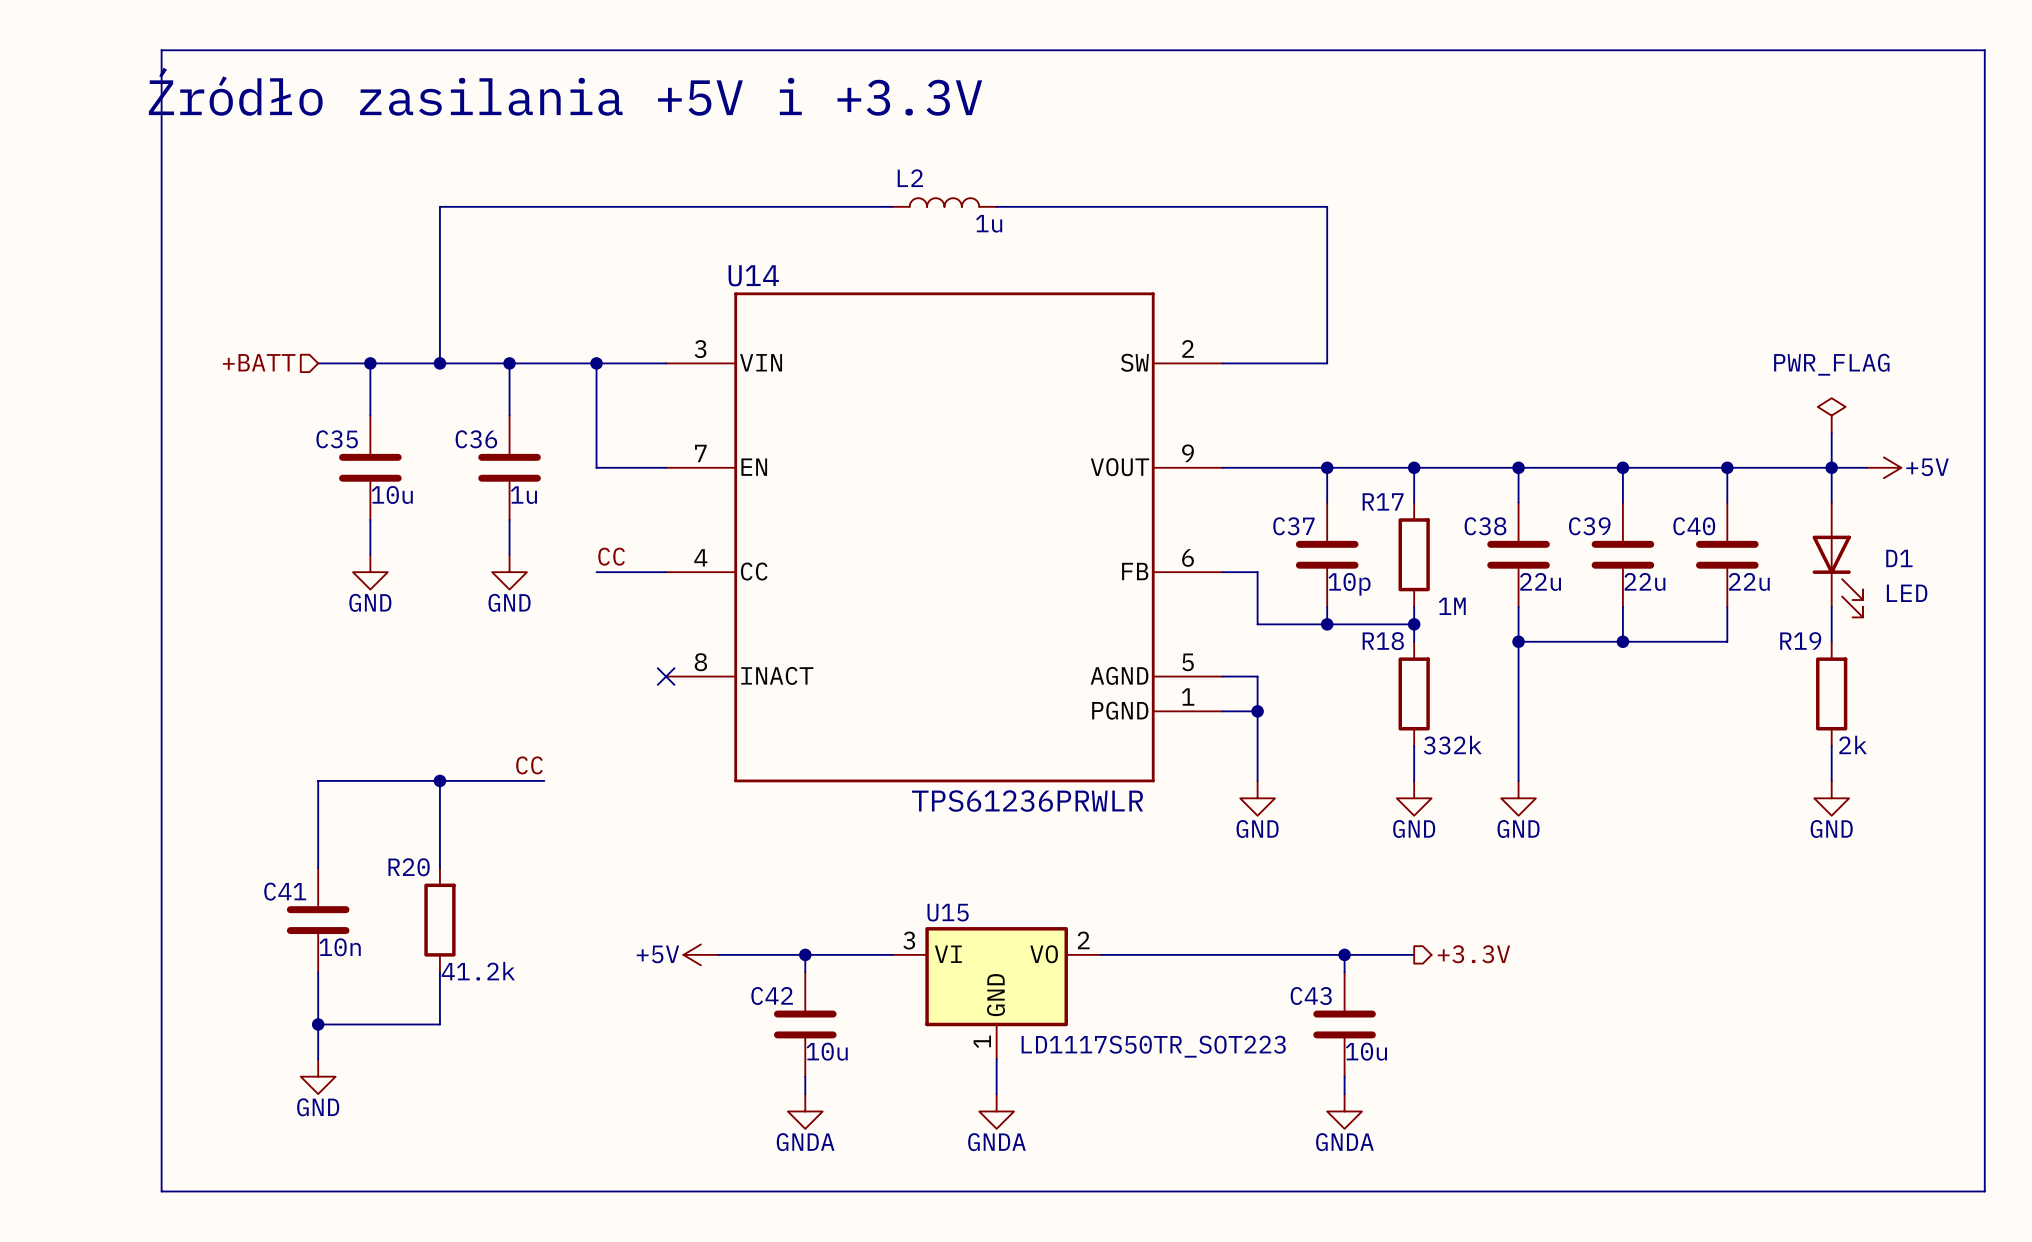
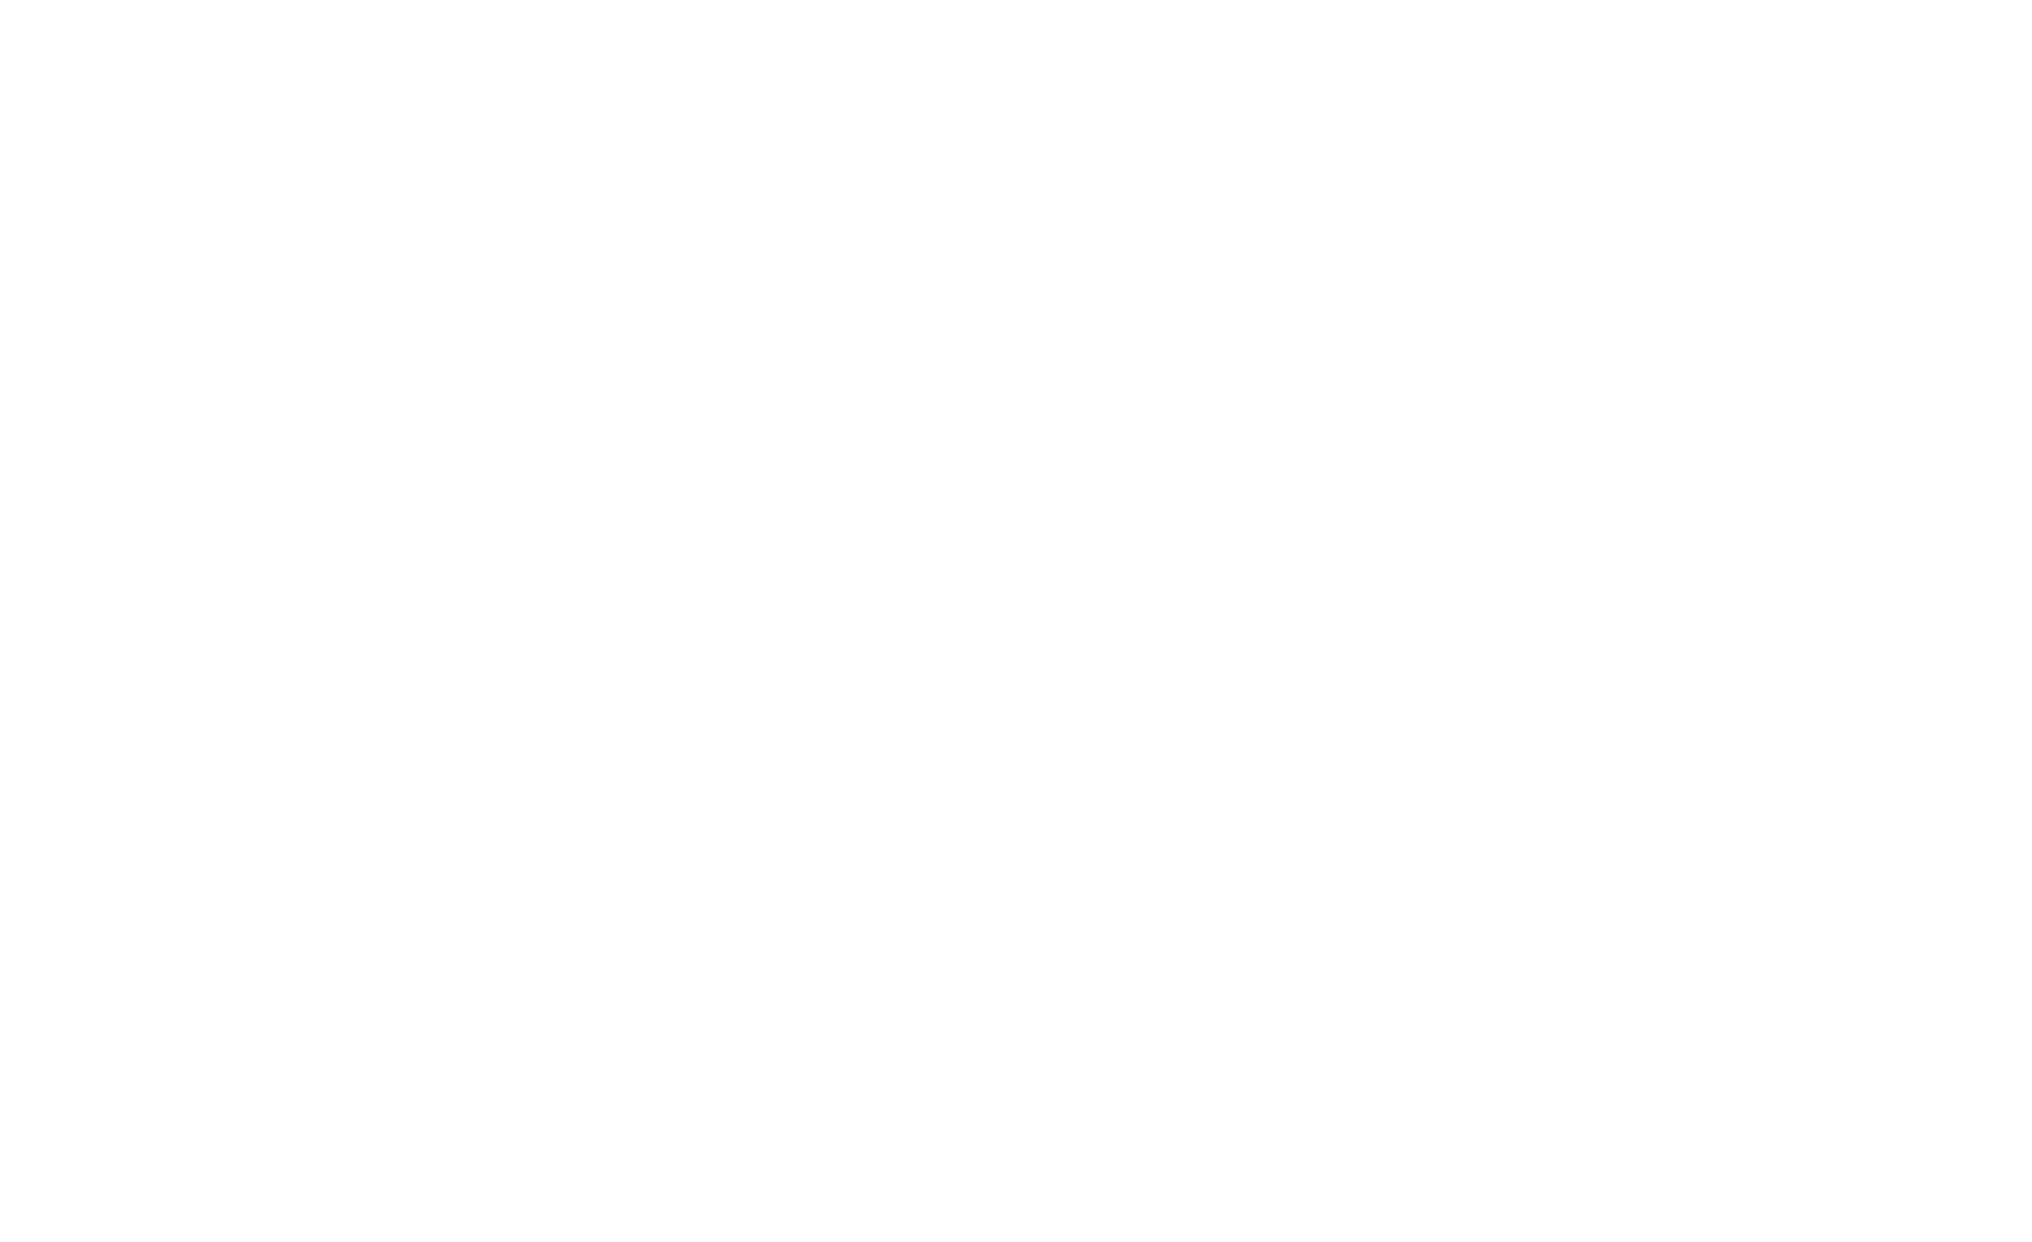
line: (161, 50) (1984, 50) (1984, 1191) (161, 1191) (161, 50) -> none
text: Źródło zasilania +5V i +3.3V (565, 91) -> none
L2: 1u (944, 202) -> none
wire: (892, 206) (439, 206) (439, 363) -> none
wire: (996, 206) (1327, 206) (1327, 363) (1222, 363) -> none
hierarchical label: +BATT (259, 362) -> none
wire: (318, 363) (666, 363) -> none
wire: (370, 363) (370, 415) -> none
junction: (370, 363) -> none
junction: (439, 363) -> none
wire: (509, 363) (509, 415) -> none
junction: (509, 363) -> none
wire: (596, 363) (596, 467) (666, 467) -> none
junction: (596, 363) -> none
power symbol: PWR_FLAG (1831, 415) -> none
wire: (1831, 433) (1831, 502) -> none
C35: 10u (370, 467) -> none
C36: 1u (509, 467) -> none
wire: (1222, 467) (1866, 467) -> none
wire: (1327, 467) (1327, 502) -> none
junction: (1327, 467) -> none
wire: (1414, 467) (1414, 502) -> none
junction: (1414, 467) -> none
wire: (1518, 467) (1518, 502) -> none
junction: (1518, 467) -> none
wire: (1622, 467) (1622, 502) -> none
junction: (1622, 467) -> none
wire: (1727, 467) (1727, 502) -> none
junction: (1727, 467) -> none
junction: (1831, 467) -> none
power symbol: +5V (1883, 467) -> none
wire: (370, 519) (370, 554) -> none
wire: (509, 519) (509, 554) -> none
U14: TPS61236PRWLR (944, 537) -> none
C37: 10p (1327, 554) -> none
R17: 1M (1414, 554) -> none
C38: 22u (1518, 554) -> none
C39: 22u (1622, 554) -> none
C40: 22u (1727, 554) -> none
label: CC (611, 556) -> none
D1: LED (1837, 560) -> none
power symbol: GND (370, 572) -> none
power symbol: GND (509, 572) -> none
wire: (596, 572) (666, 572) -> none
wire: (1222, 572) (1257, 572) (1257, 624) (1414, 624) -> none
wire: (1327, 606) (1327, 624) -> none
wire: (1414, 606) (1414, 641) -> none
wire: (1518, 606) (1518, 780) -> none
wire: (1622, 606) (1622, 641) -> none
wire: (1727, 606) (1727, 641) (1518, 641) -> none
wire: (1831, 606) (1831, 641) -> none
junction: (1327, 624) -> none
junction: (1414, 624) -> none
junction: (1518, 641) -> none
junction: (1622, 641) -> none
no-connect mark: (666, 676) -> none
wire: (1222, 676) (1257, 676) (1257, 780) -> none
R18: 332k (1414, 693) -> none
R19: 2k (1831, 693) -> none
wire: (1222, 711) (1257, 711) -> none
junction: (1257, 711) -> none
wire: (1414, 746) (1414, 780) -> none
wire: (1831, 746) (1831, 780) -> none
label: CC (529, 765) -> none
wire: (439, 780) (439, 867) -> none
junction: (439, 780) -> none
wire: (544, 780) (318, 780) (318, 867) -> none
power symbol: GND (1257, 798) -> none
power symbol: GND (1414, 798) -> none
power symbol: GND (1518, 798) -> none
power symbol: GND (1831, 798) -> none
C41: 10n (318, 920) -> none
R20: 41.2k (439, 920) -> none
power symbol: +5V (700, 954) -> none
wire: (718, 954) (892, 954) -> none
wire: (805, 954) (805, 972) -> none
junction: (805, 954) -> none
wire: (1101, 954) (1414, 954) -> none
wire: (1344, 954) (1344, 972) -> none
junction: (1344, 954) -> none
hierarchical label: +3.3V (1473, 954) -> none
wire: (318, 972) (318, 1059) -> none
wire: (439, 972) (439, 1024) (318, 1024) -> none
U15: LD1117S50TR_SOT223 (996, 993) -> none
junction: (318, 1024) -> none
C42: 10u (805, 1024) -> none
C43: 10u (1344, 1024) -> none
wire: (996, 1059) (996, 1094) -> none
power symbol: GND (318, 1076) -> none
wire: (805, 1076) (805, 1094) -> none
wire: (1344, 1076) (1344, 1094) -> none
power symbol: GNDA (805, 1111) -> none
power symbol: GNDA (996, 1111) -> none
power symbol: GNDA (1344, 1111) -> none

